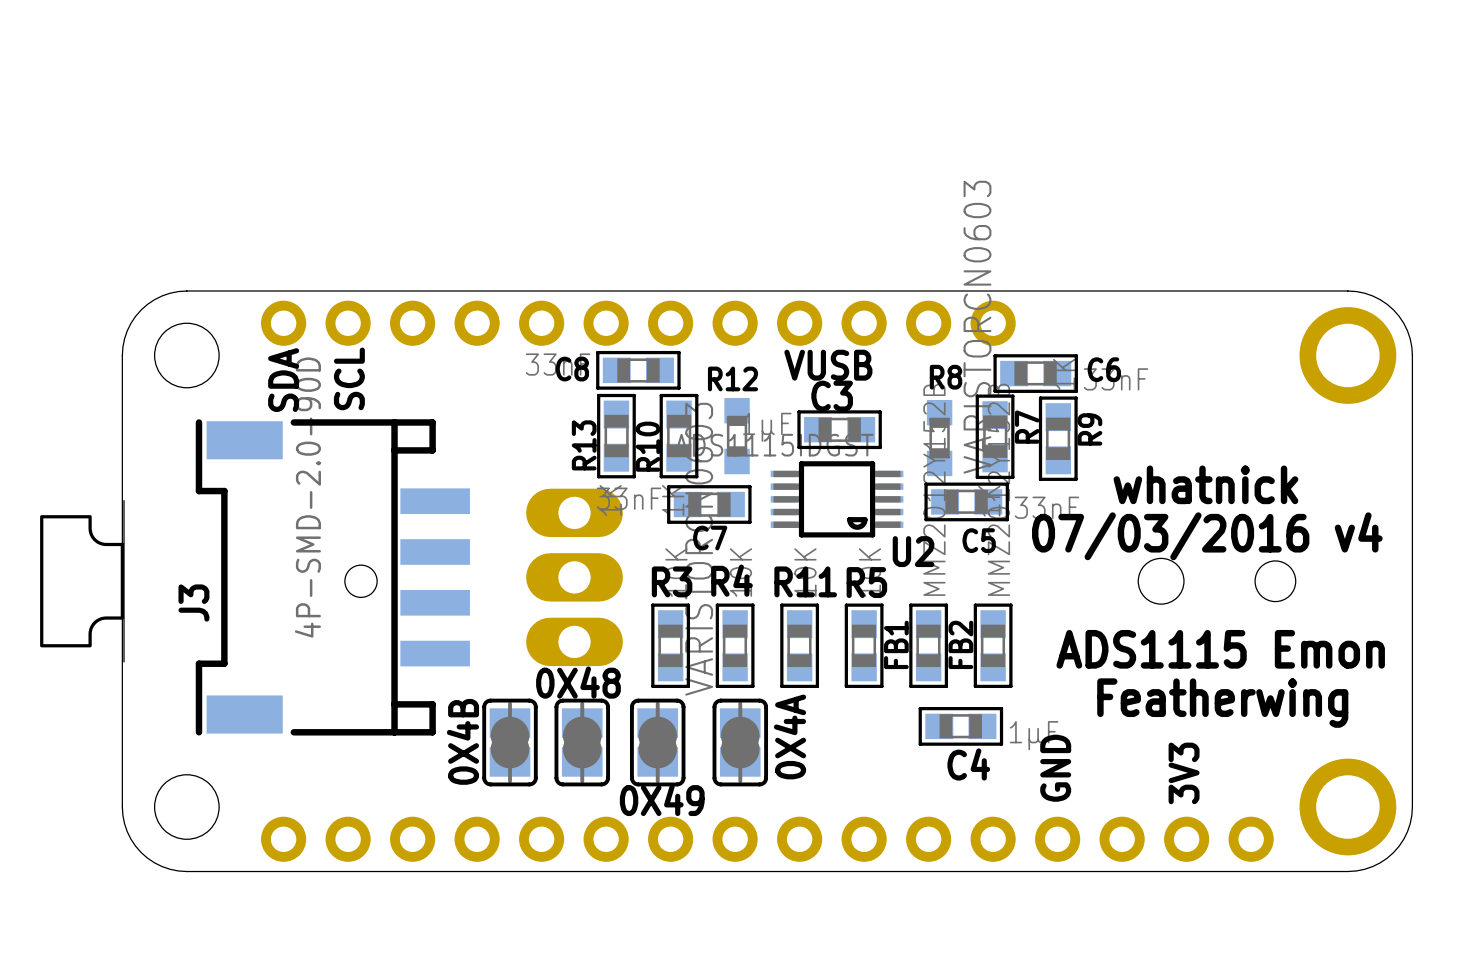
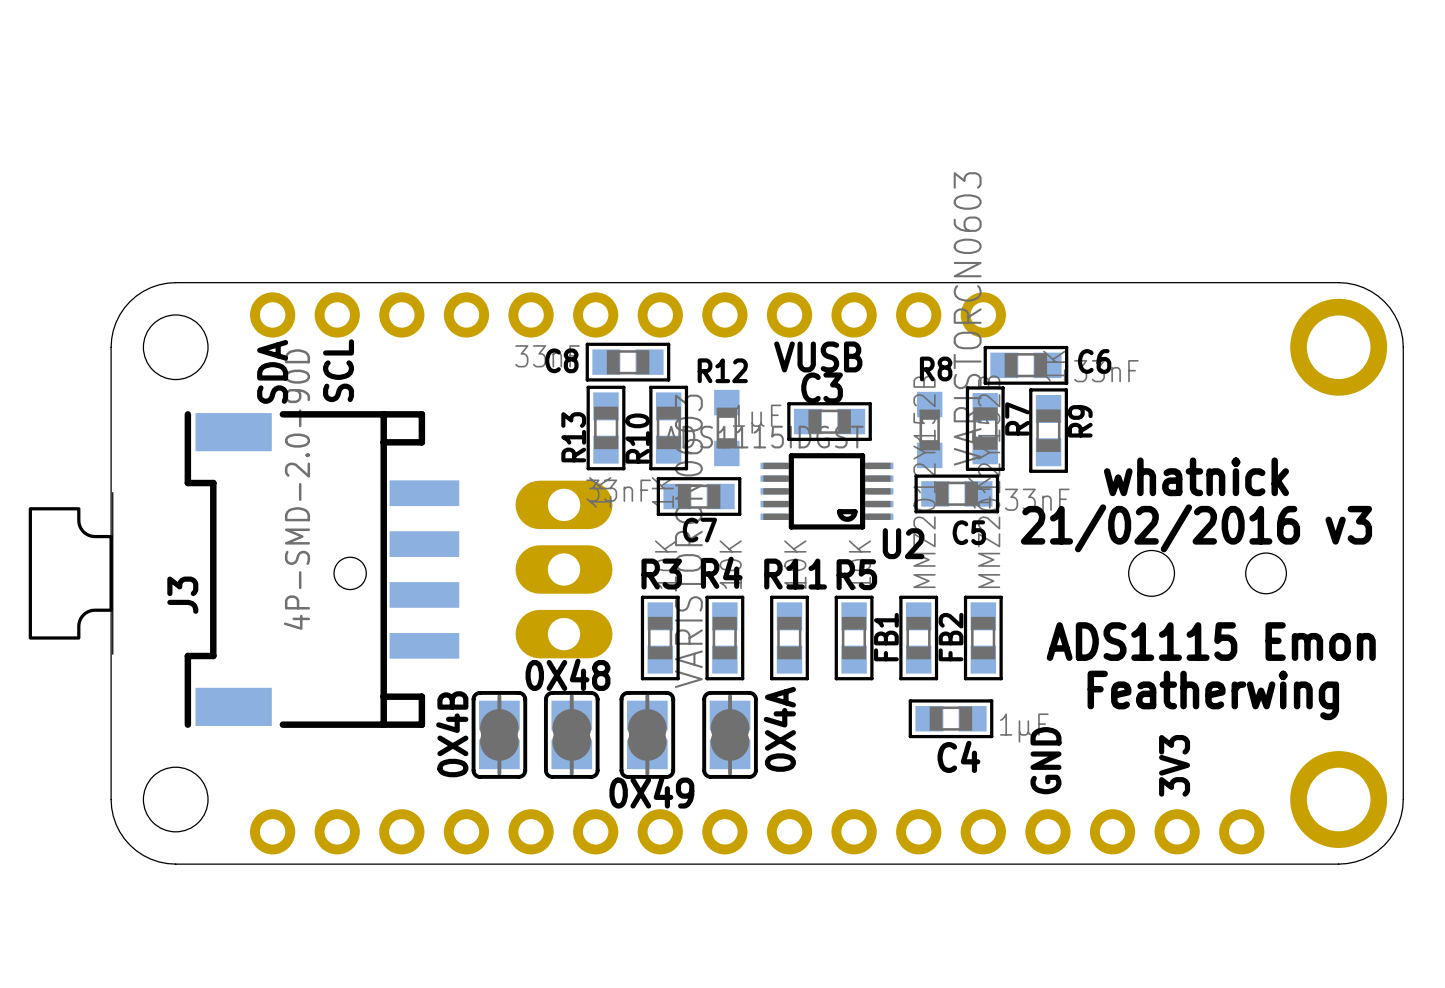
text: 07/03/2016 v4 (1207, 536) -> 21/02/2016 v3 (1196, 528)

